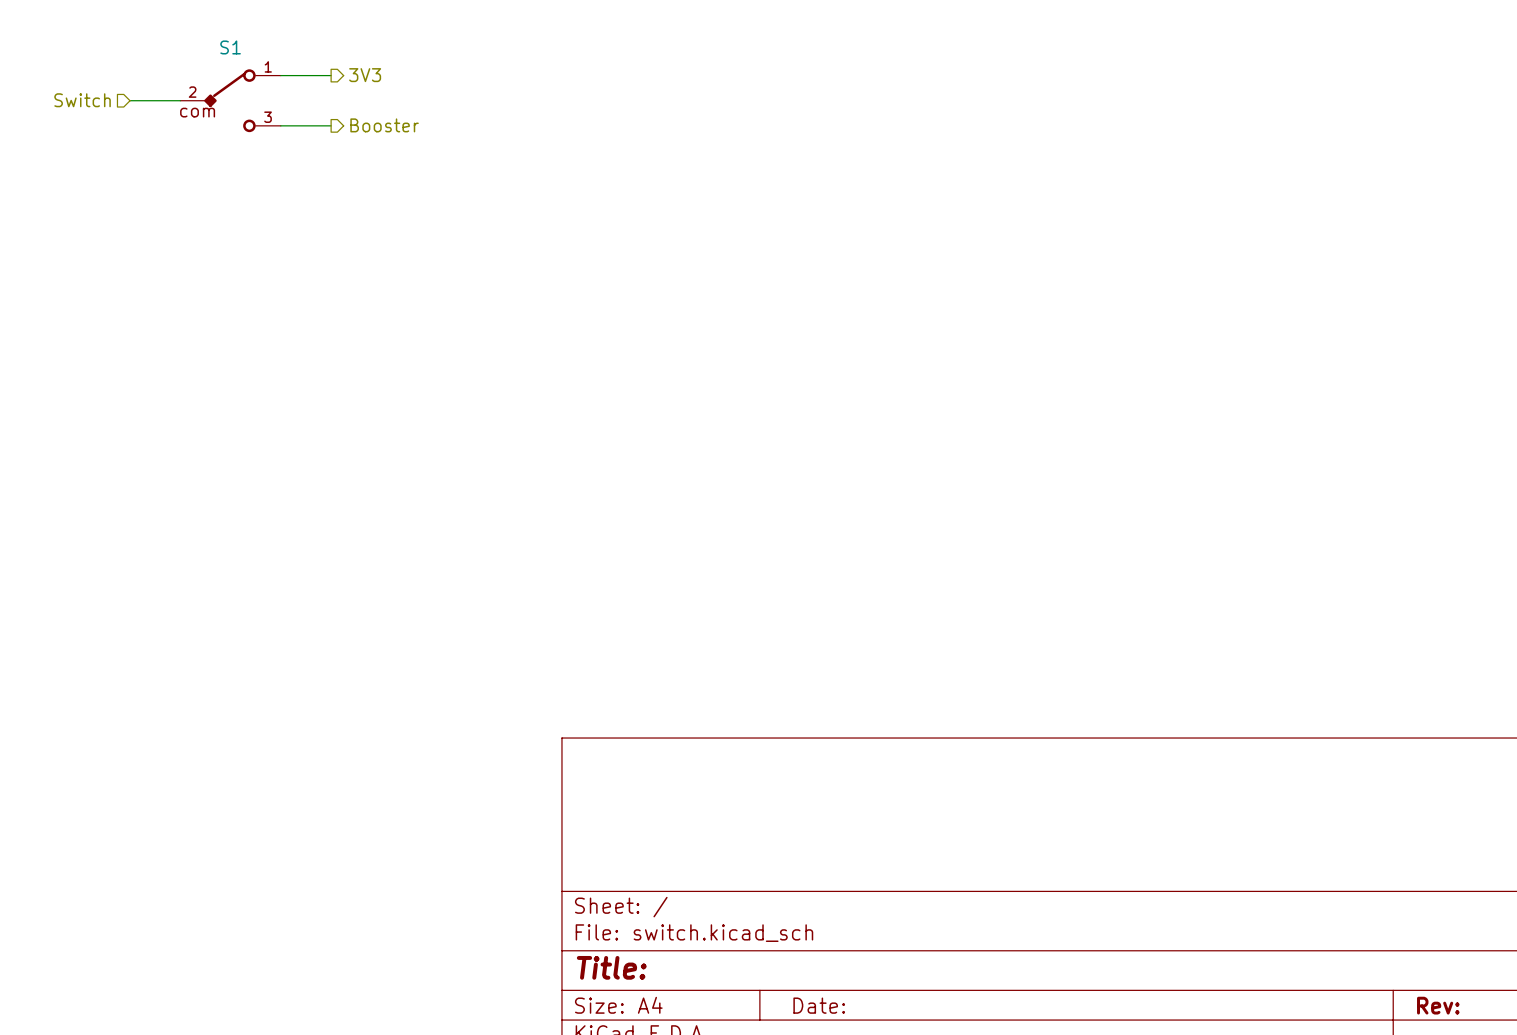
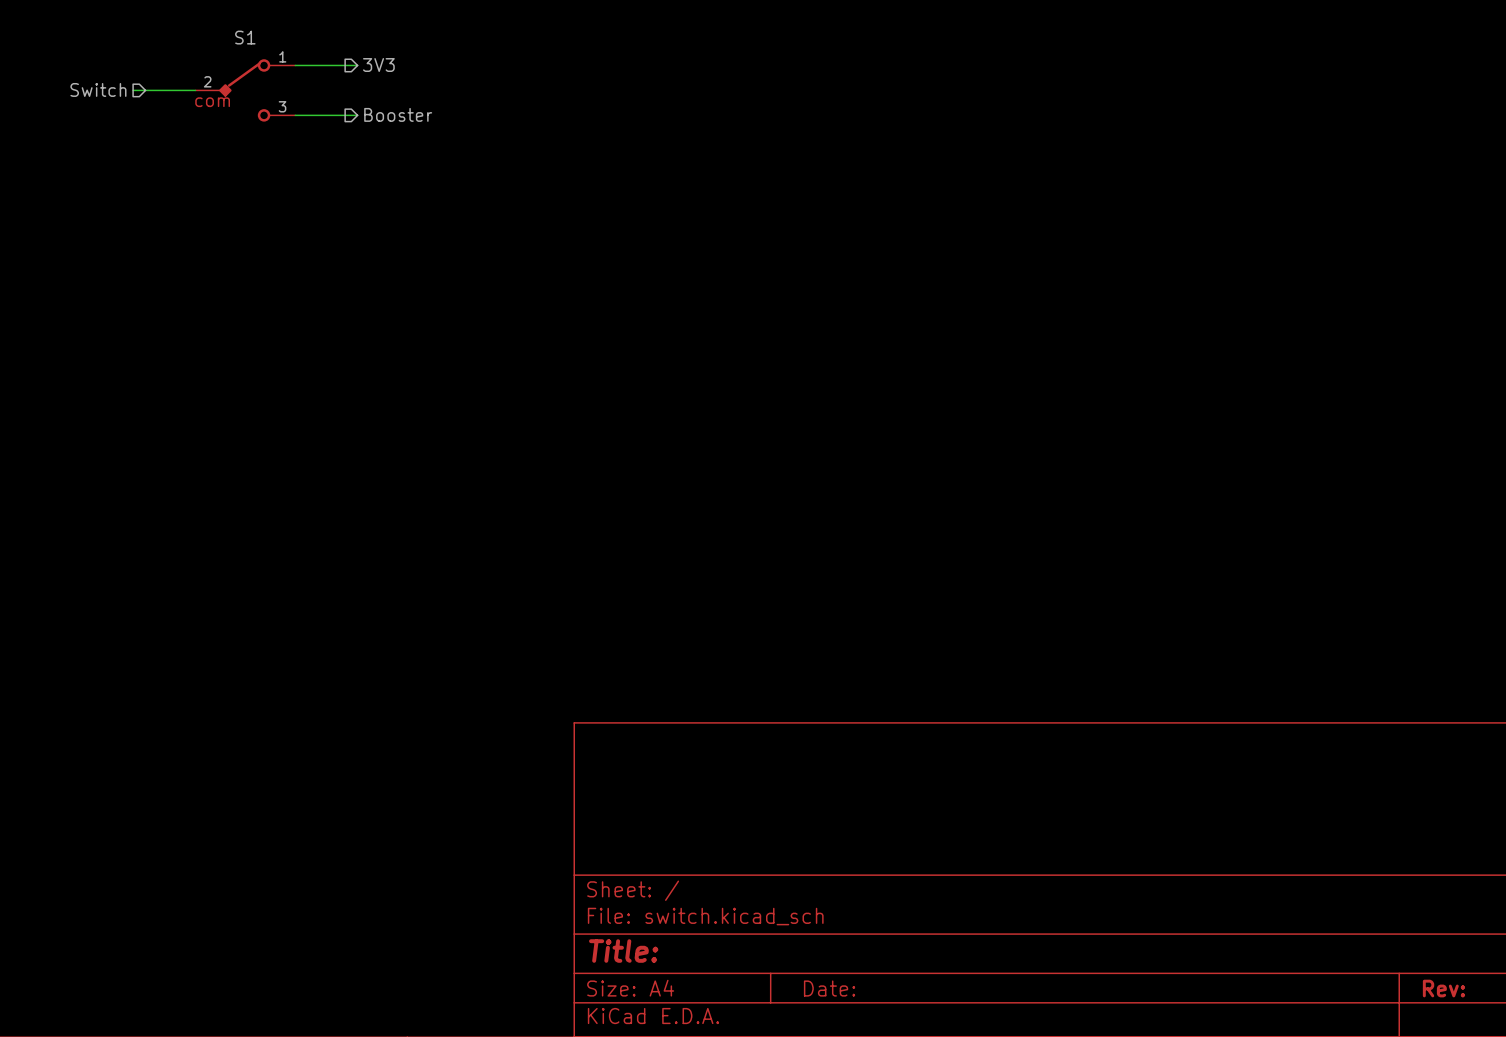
wire: none -> (345, 65) (357, 65)
wire: none -> (133, 90) (145, 90)
wire: none -> (345, 115) (357, 115)

